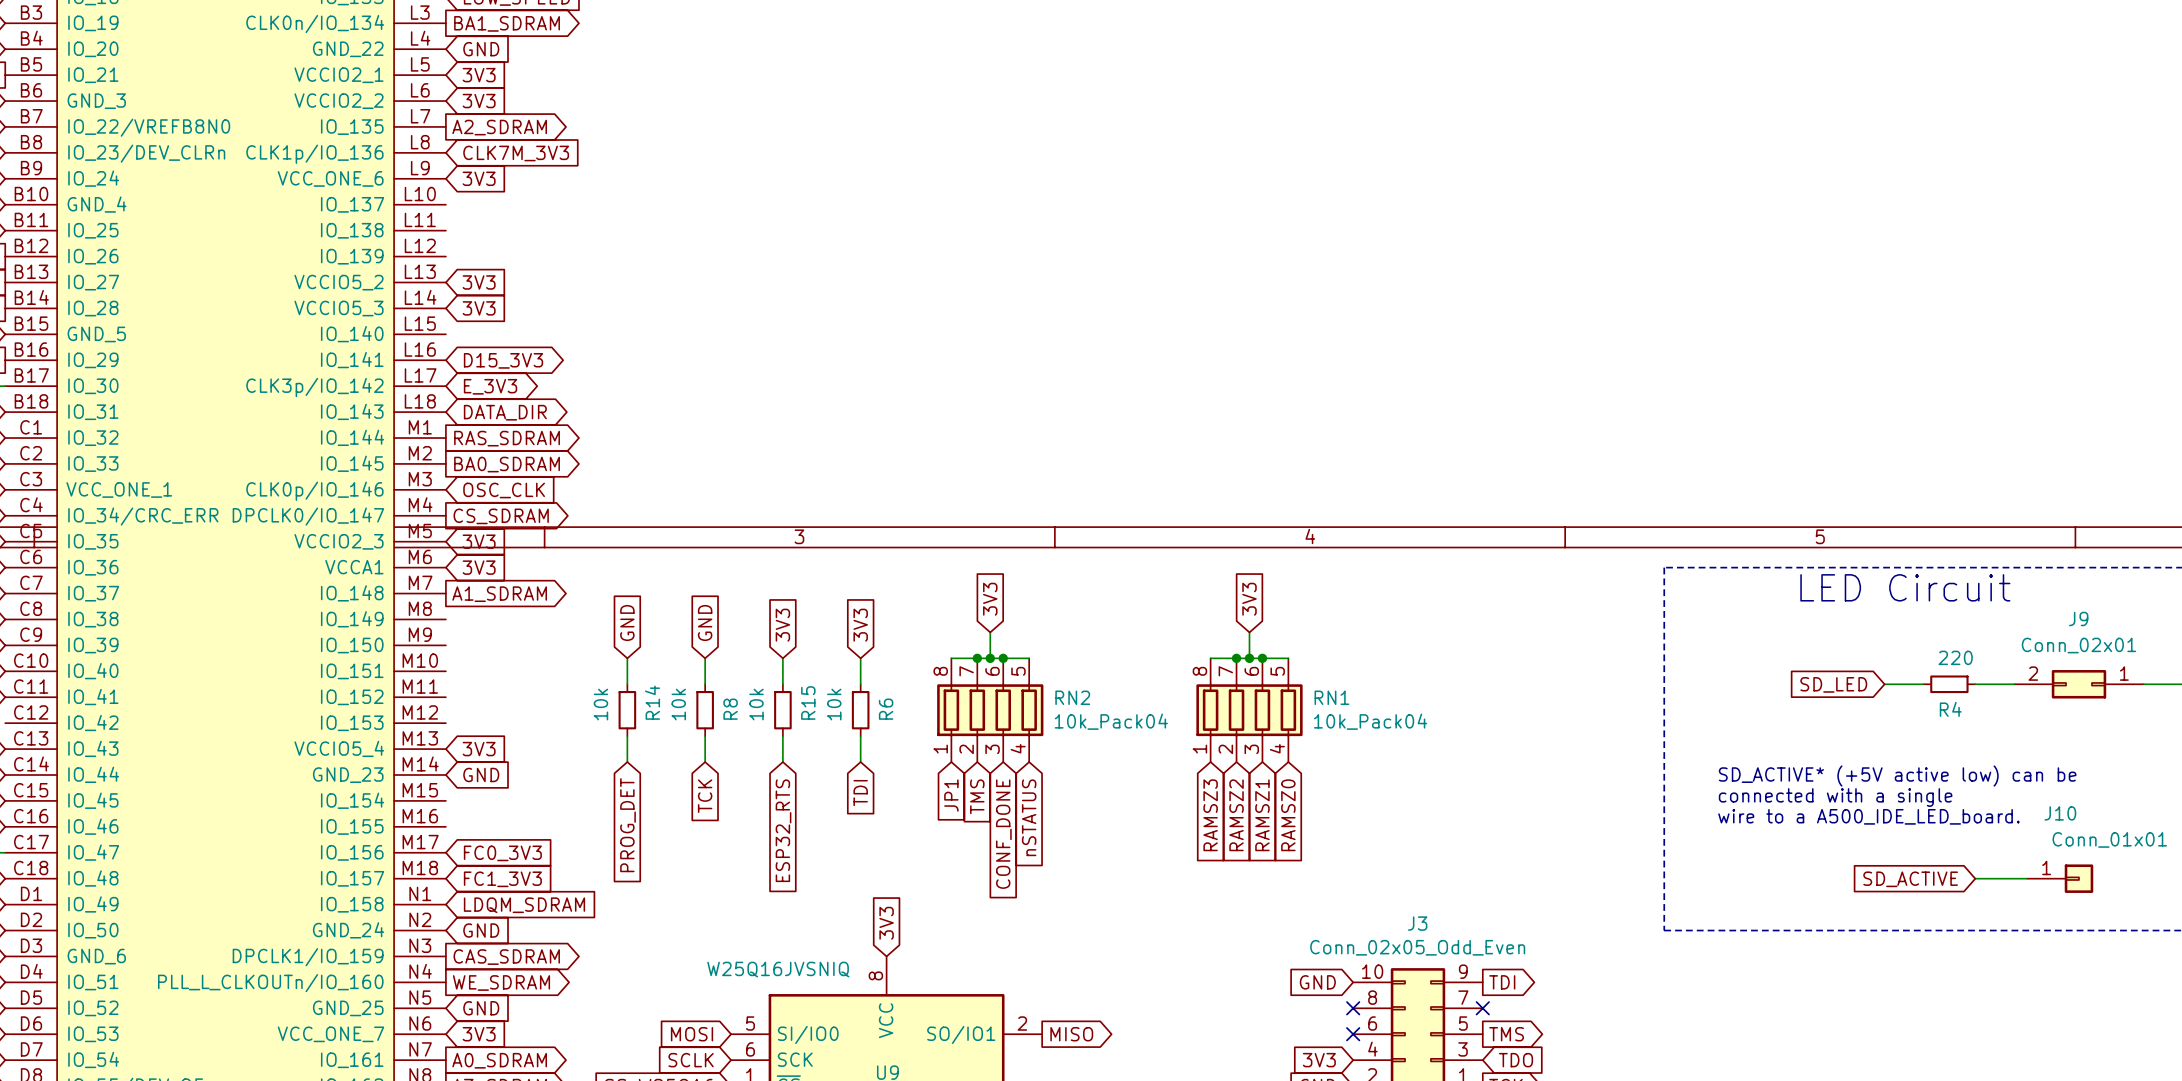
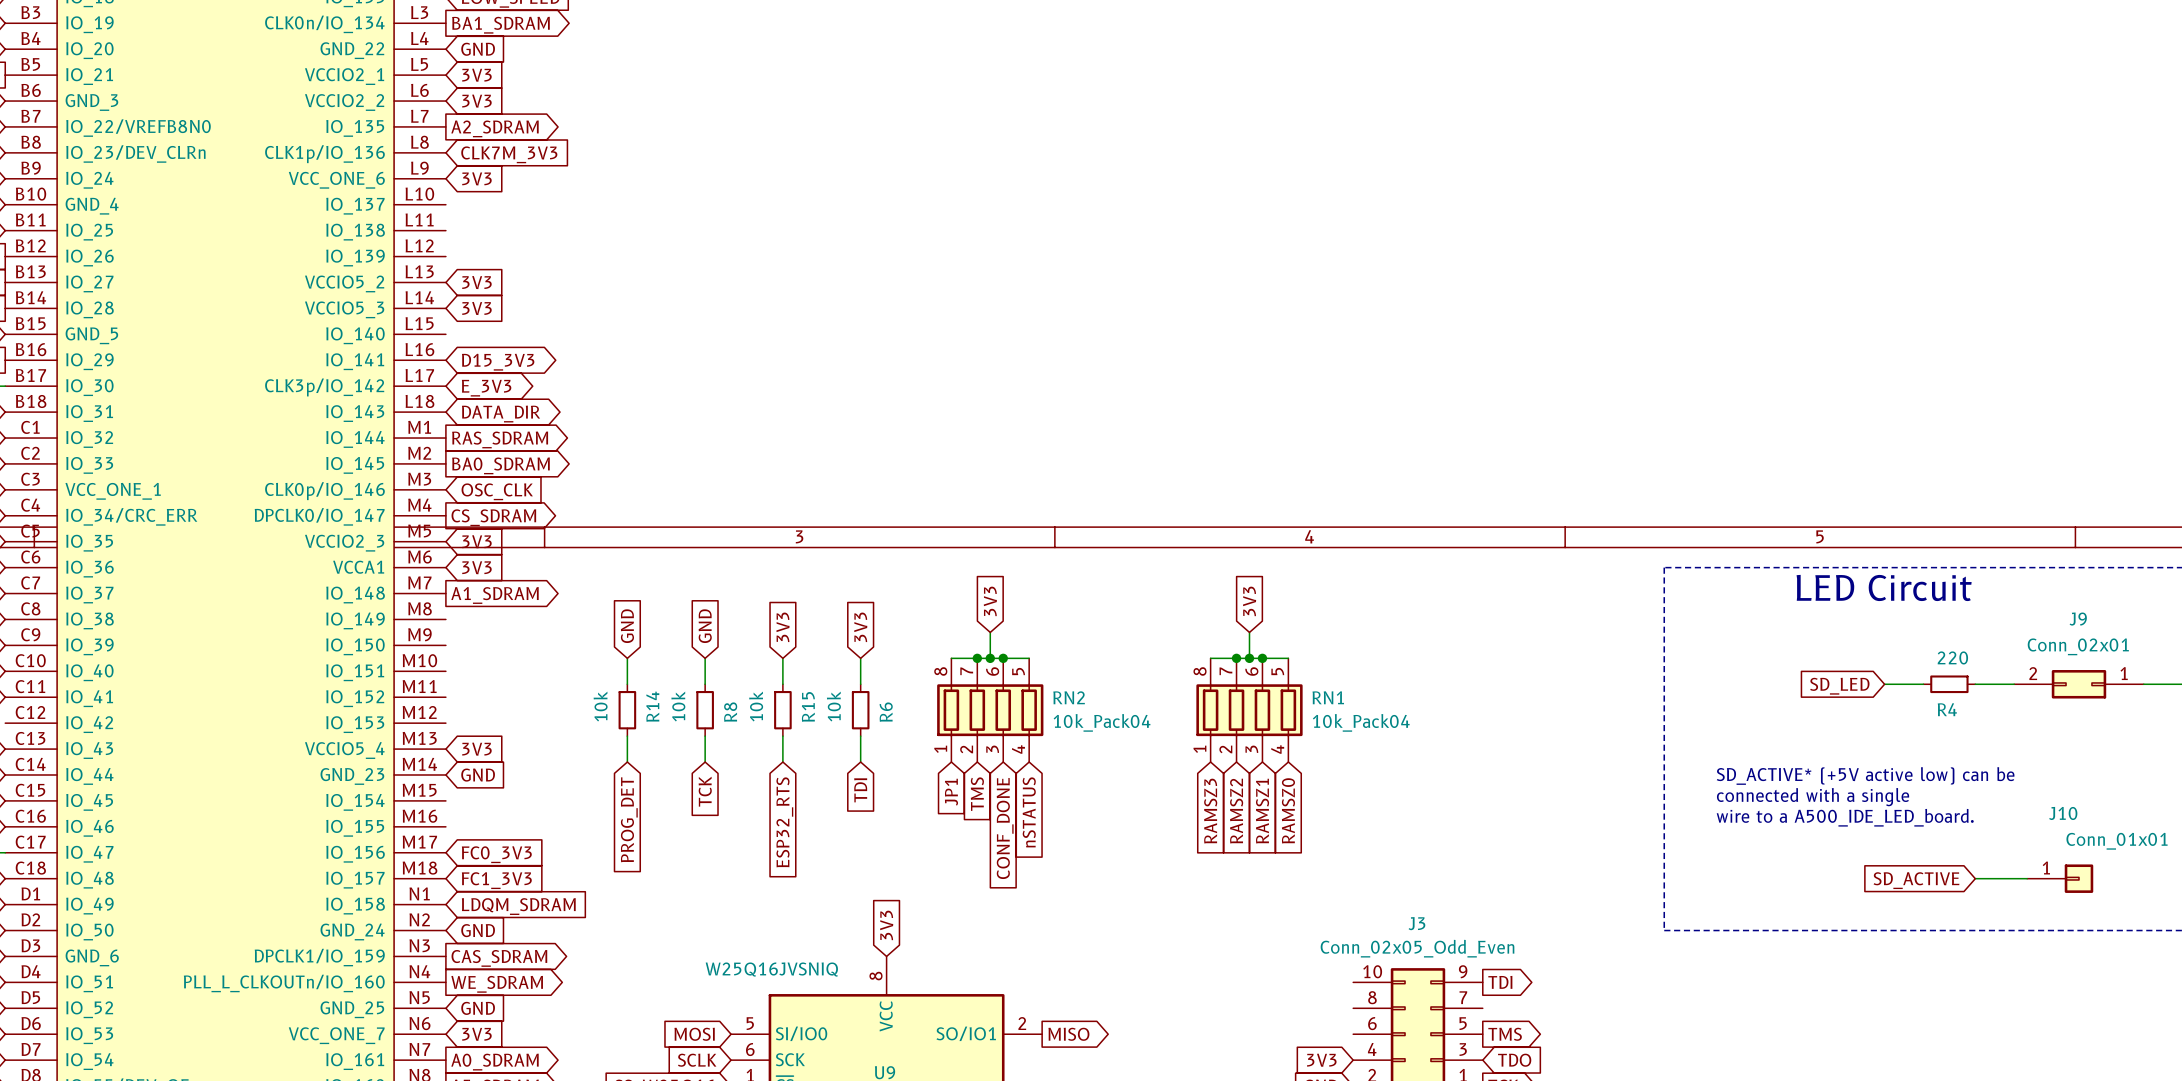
global label: GND (1317, 982) -> none
no-connect mark: (1353, 1008) -> none
no-connect mark: (1482, 1008) -> none
no-connect mark: (1353, 1034) -> none

